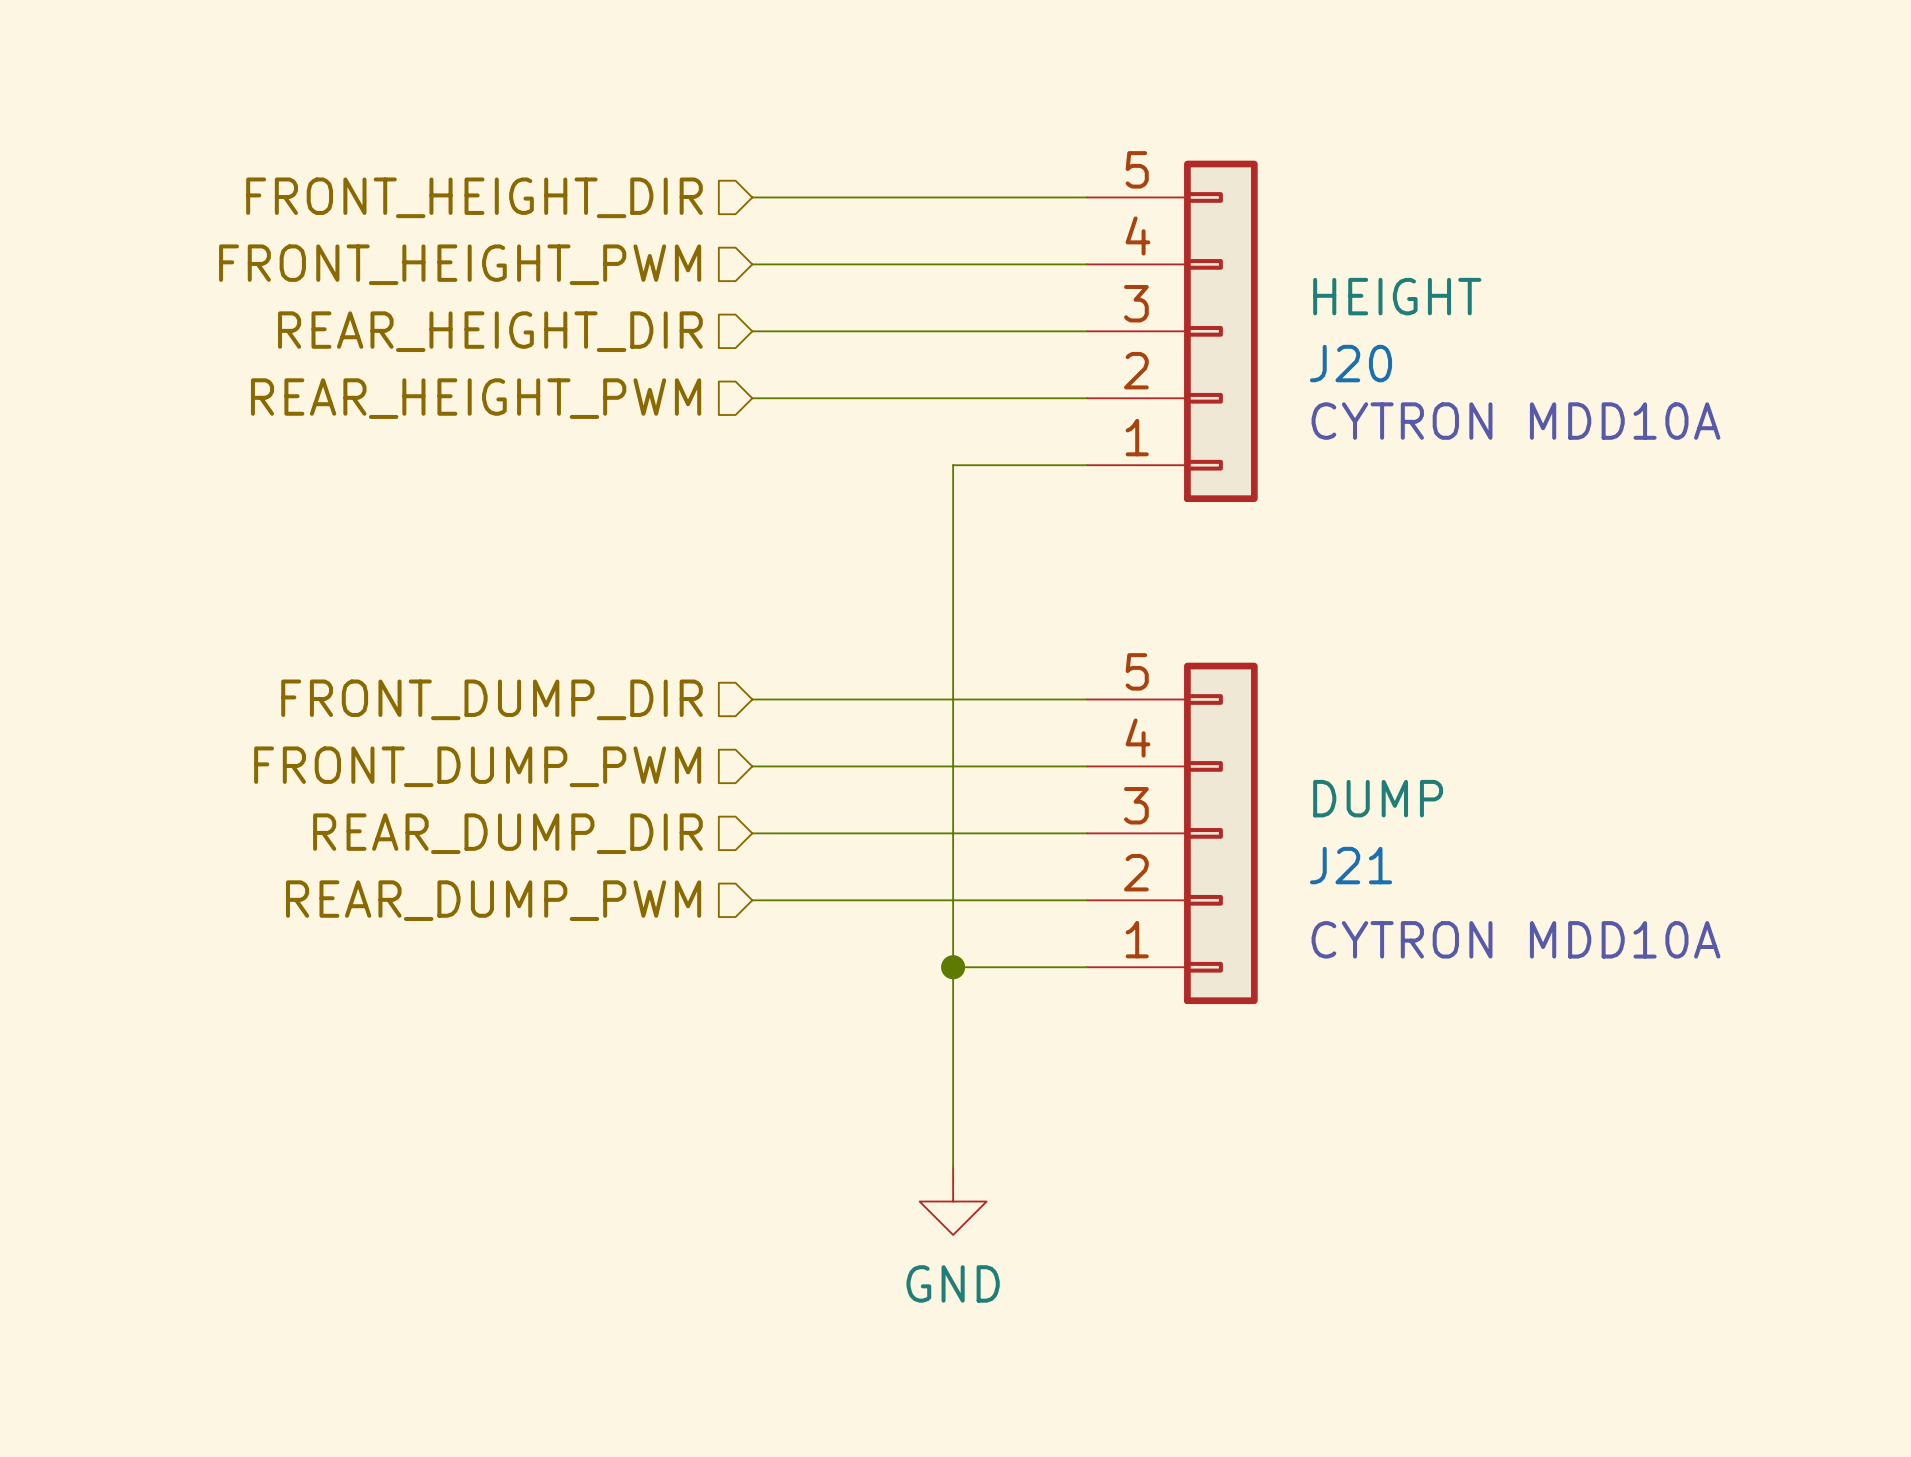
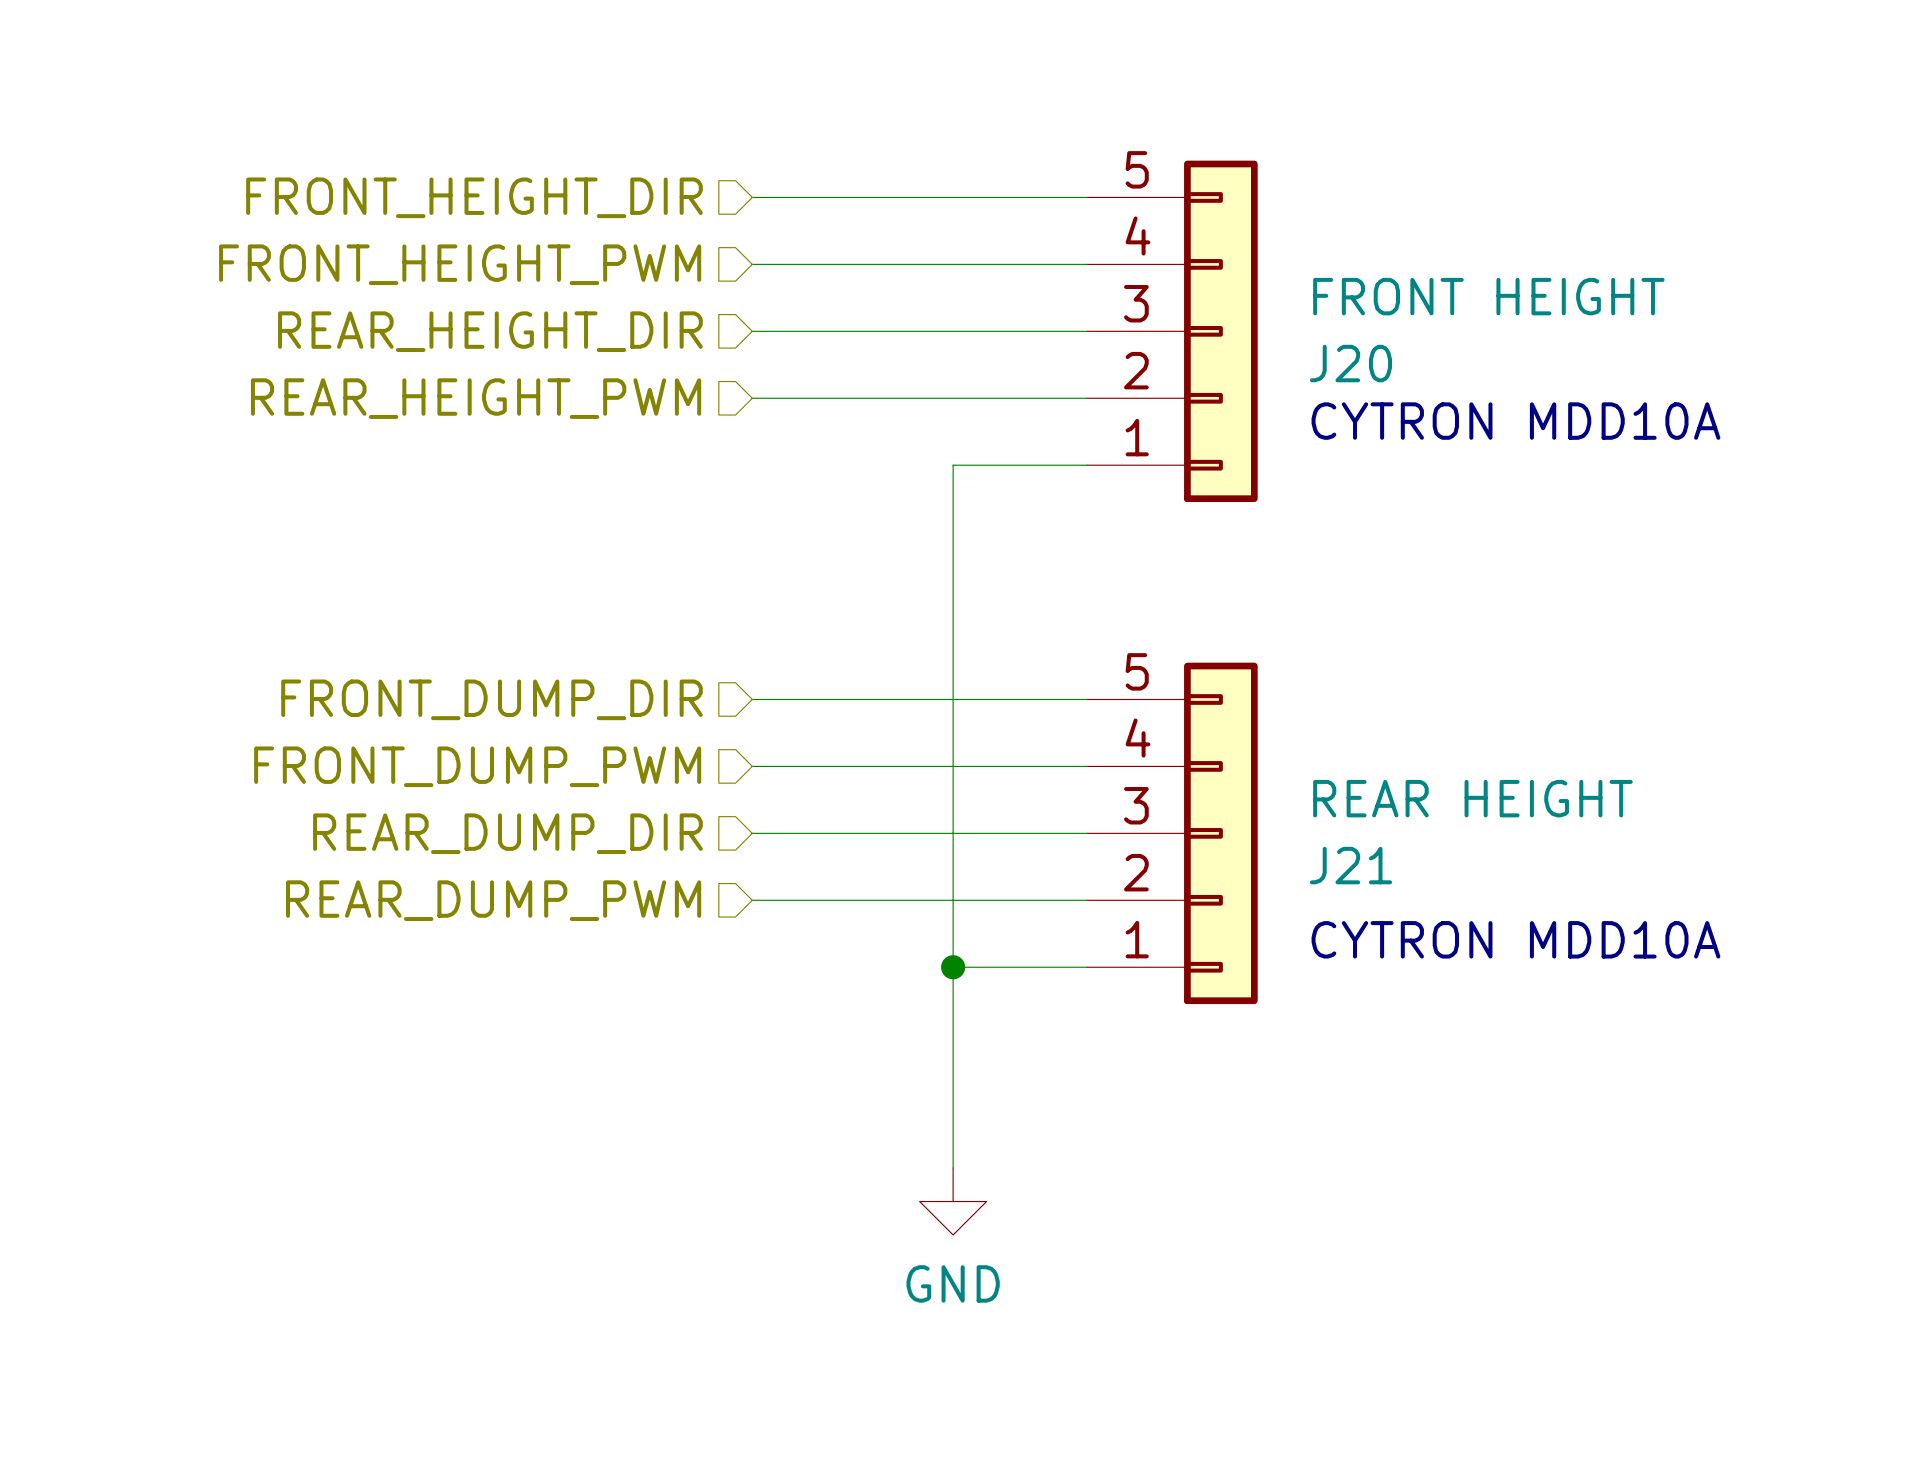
J20 value: HEIGHT (1397, 296) -> FRONT HEIGHT (1488, 296)
J21 value: DUMP (1378, 798) -> REAR HEIGHT (1472, 798)

